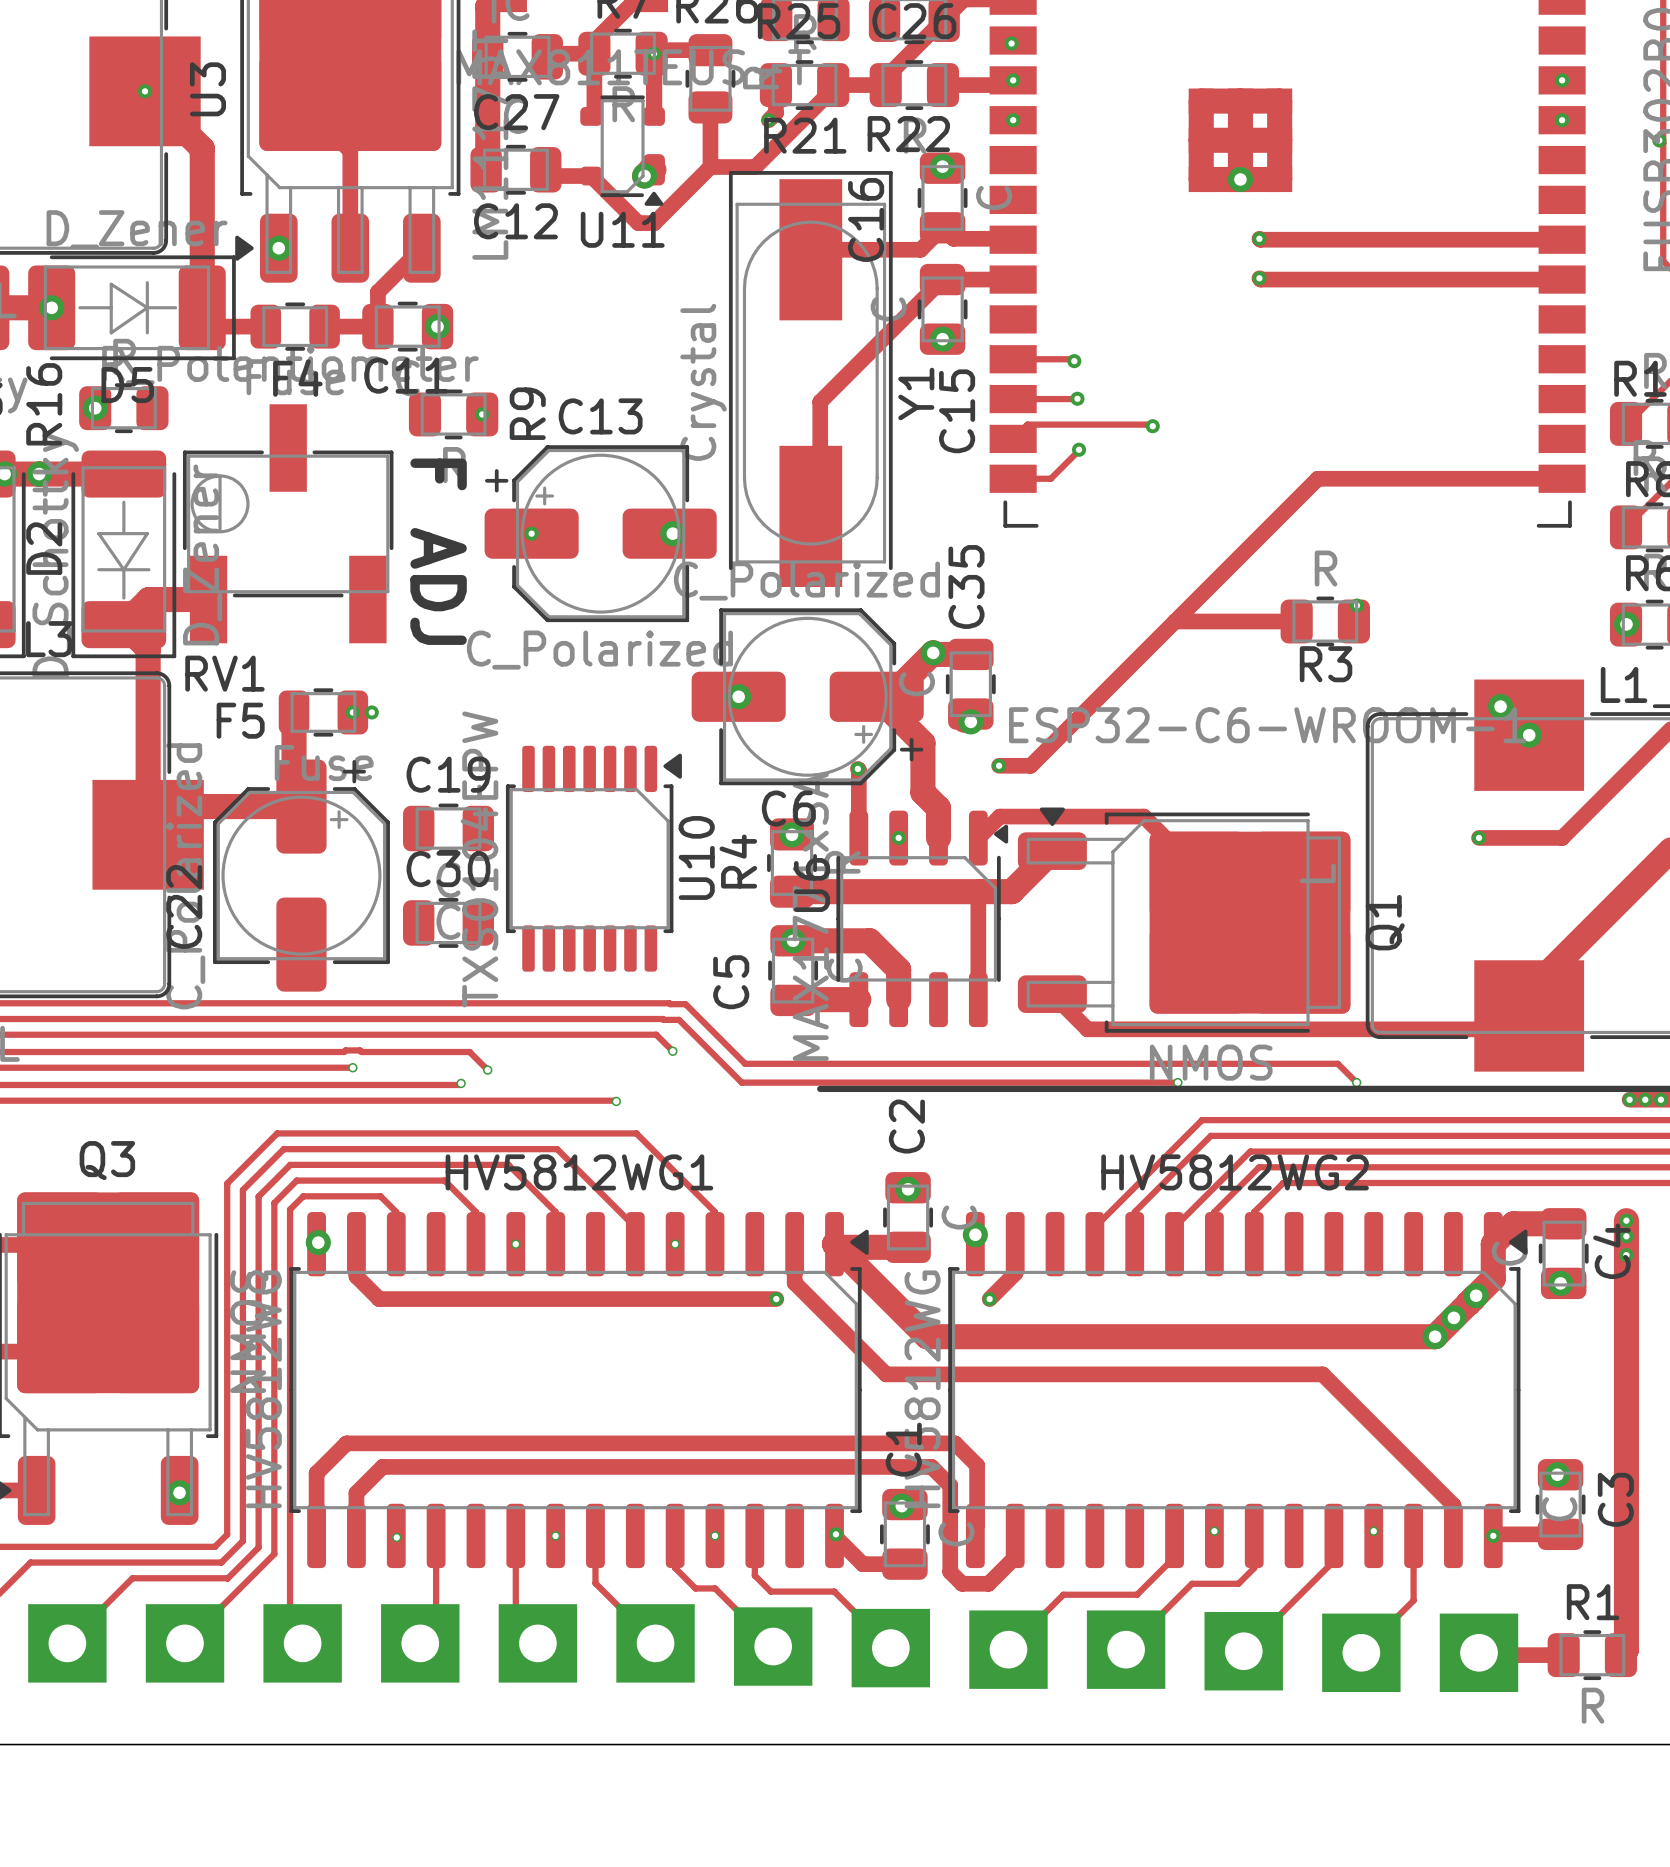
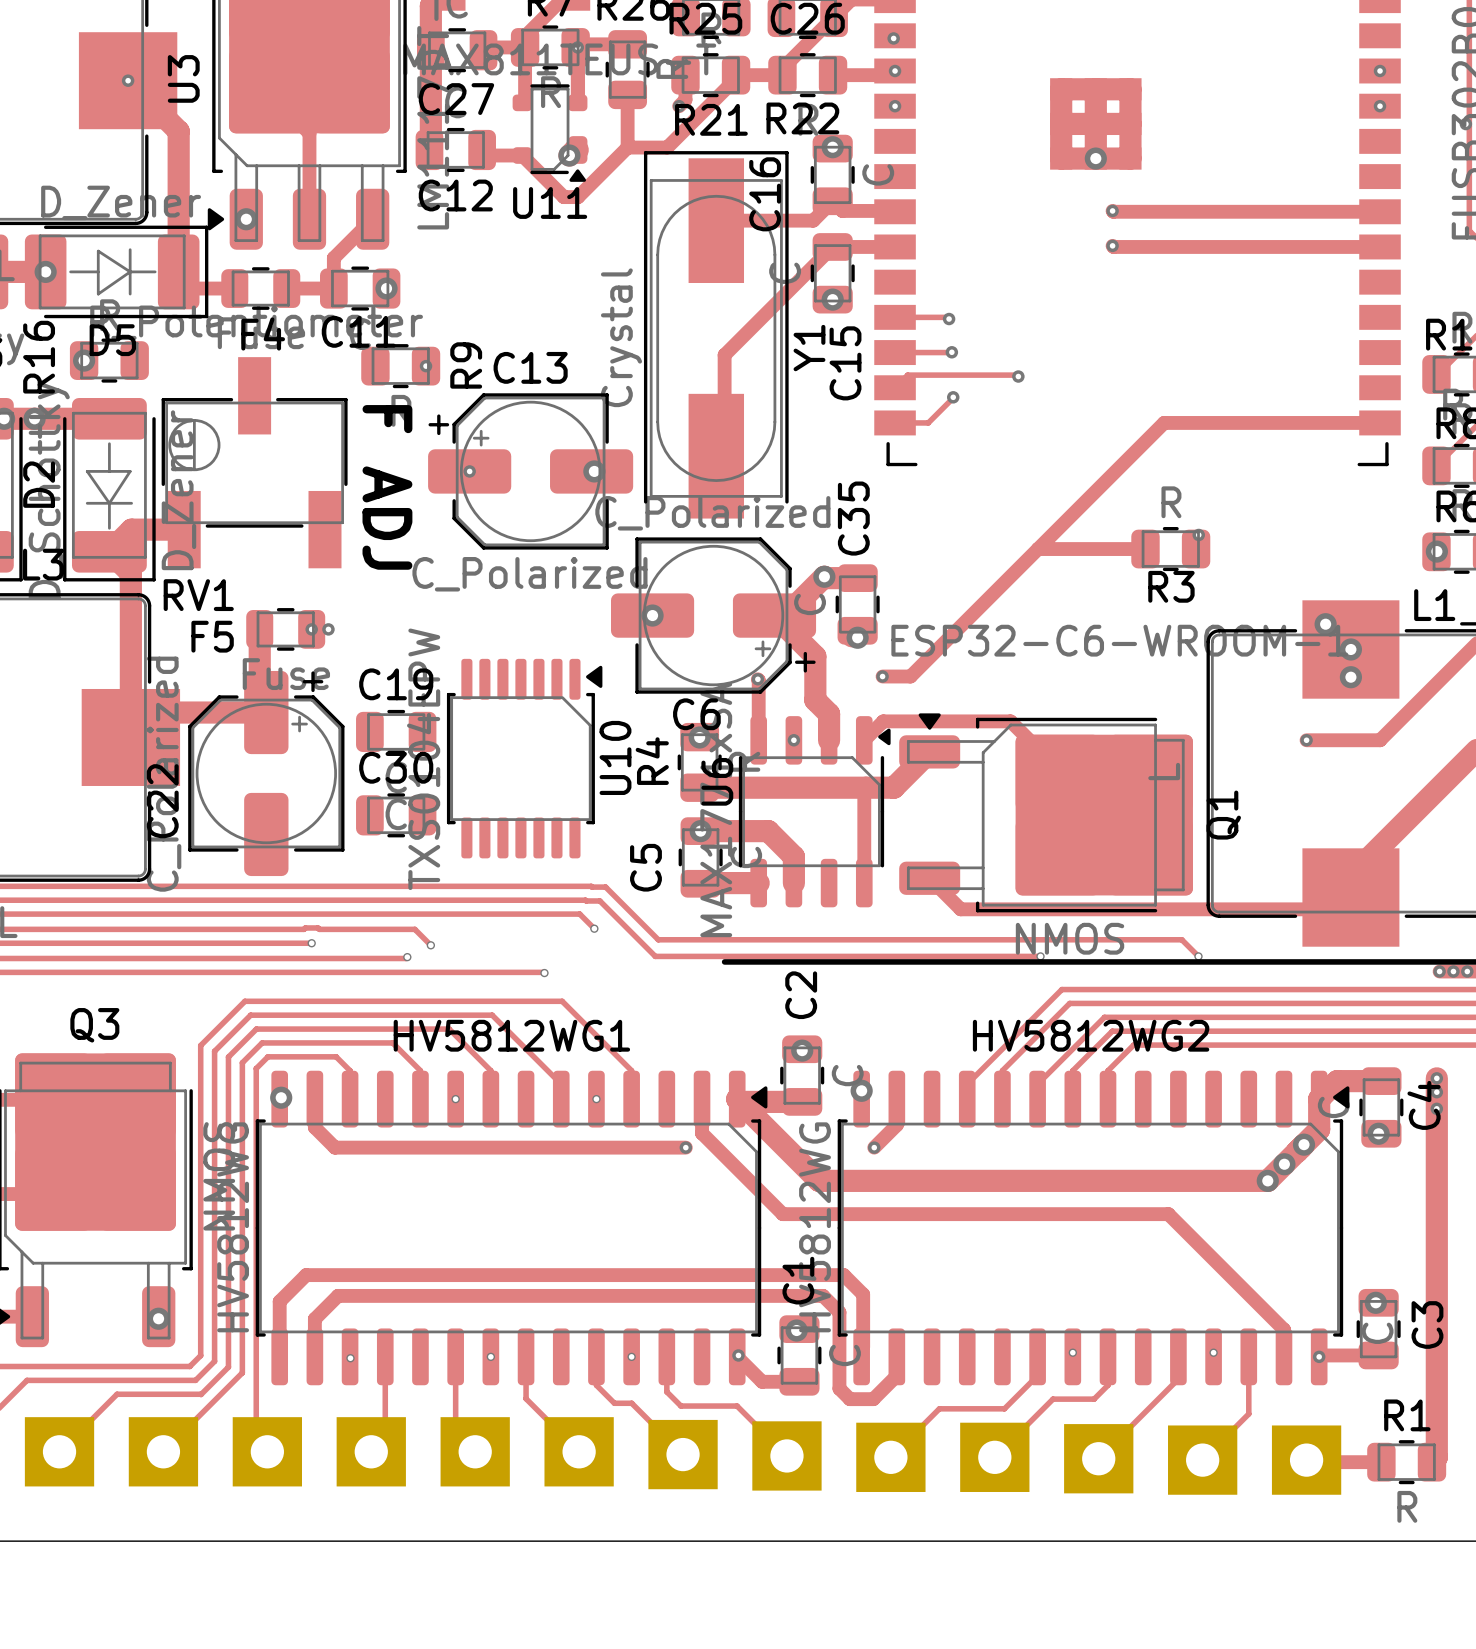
via: none -> (1350, 677)

